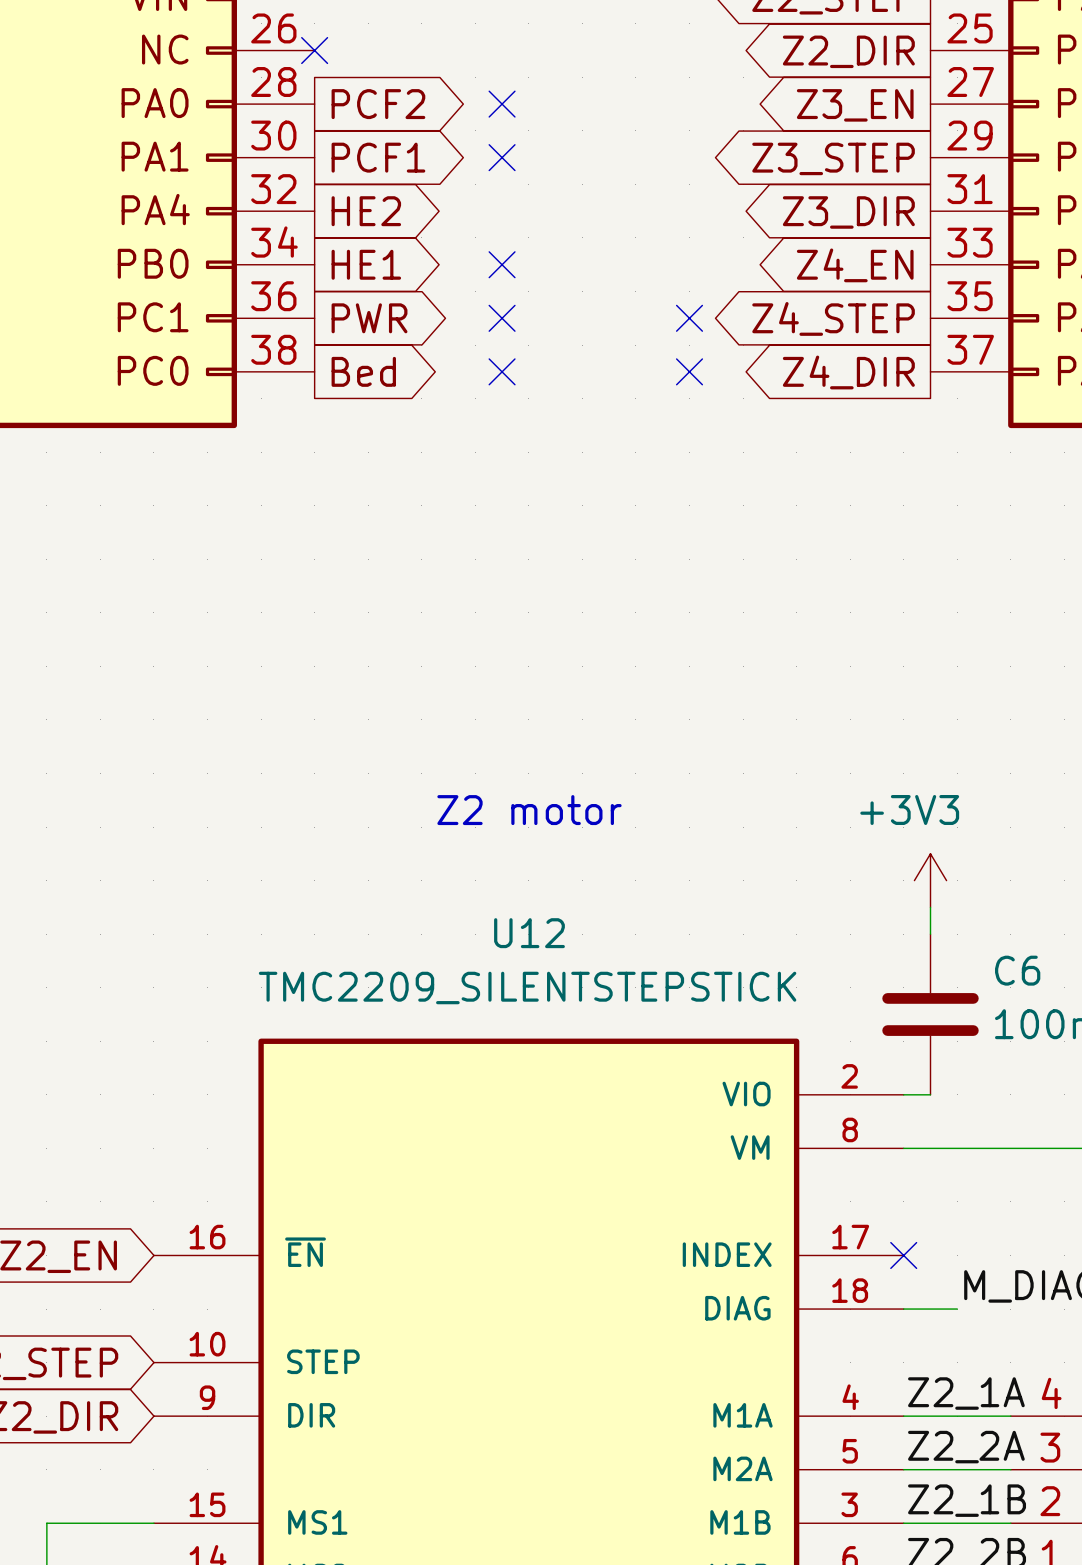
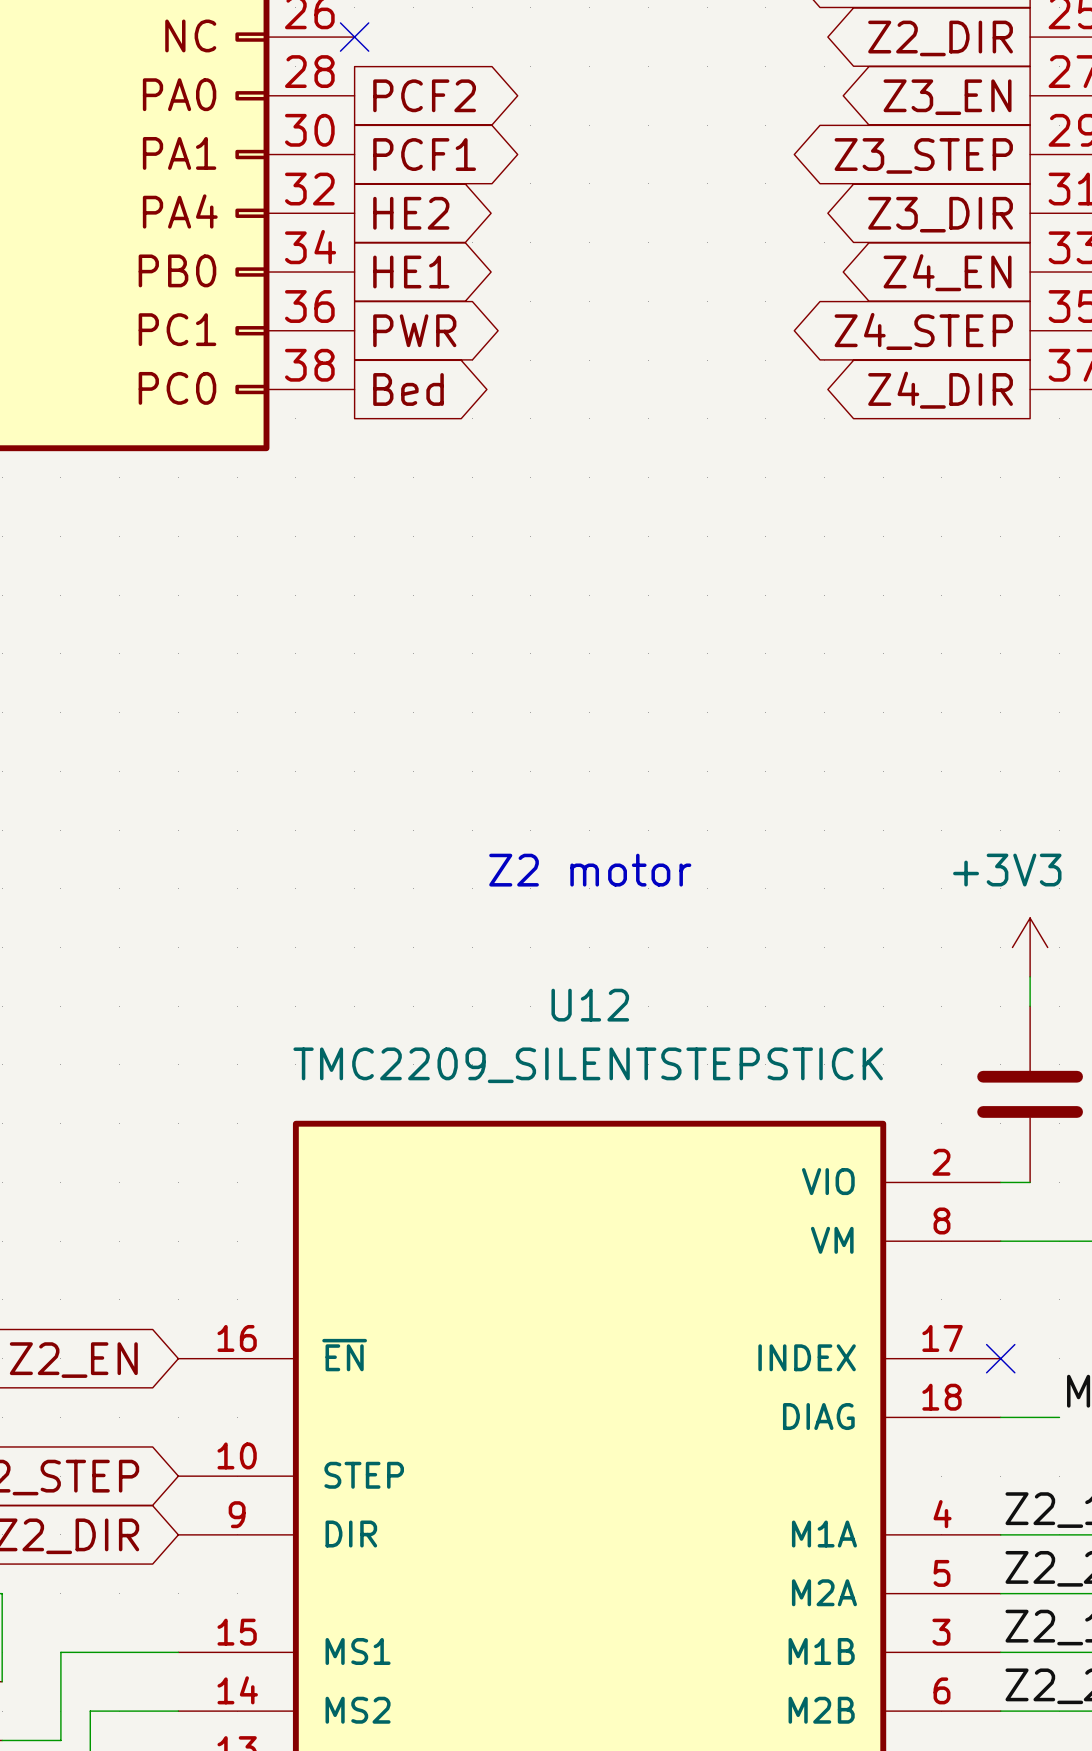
no-connect mark: (502, 104) -> none
no-connect mark: (502, 157) -> none
no-connect mark: (502, 264) -> none
no-connect mark: (502, 318) -> none
no-connect mark: (689, 318) -> none
no-connect mark: (502, 371) -> none
no-connect mark: (689, 371) -> none

